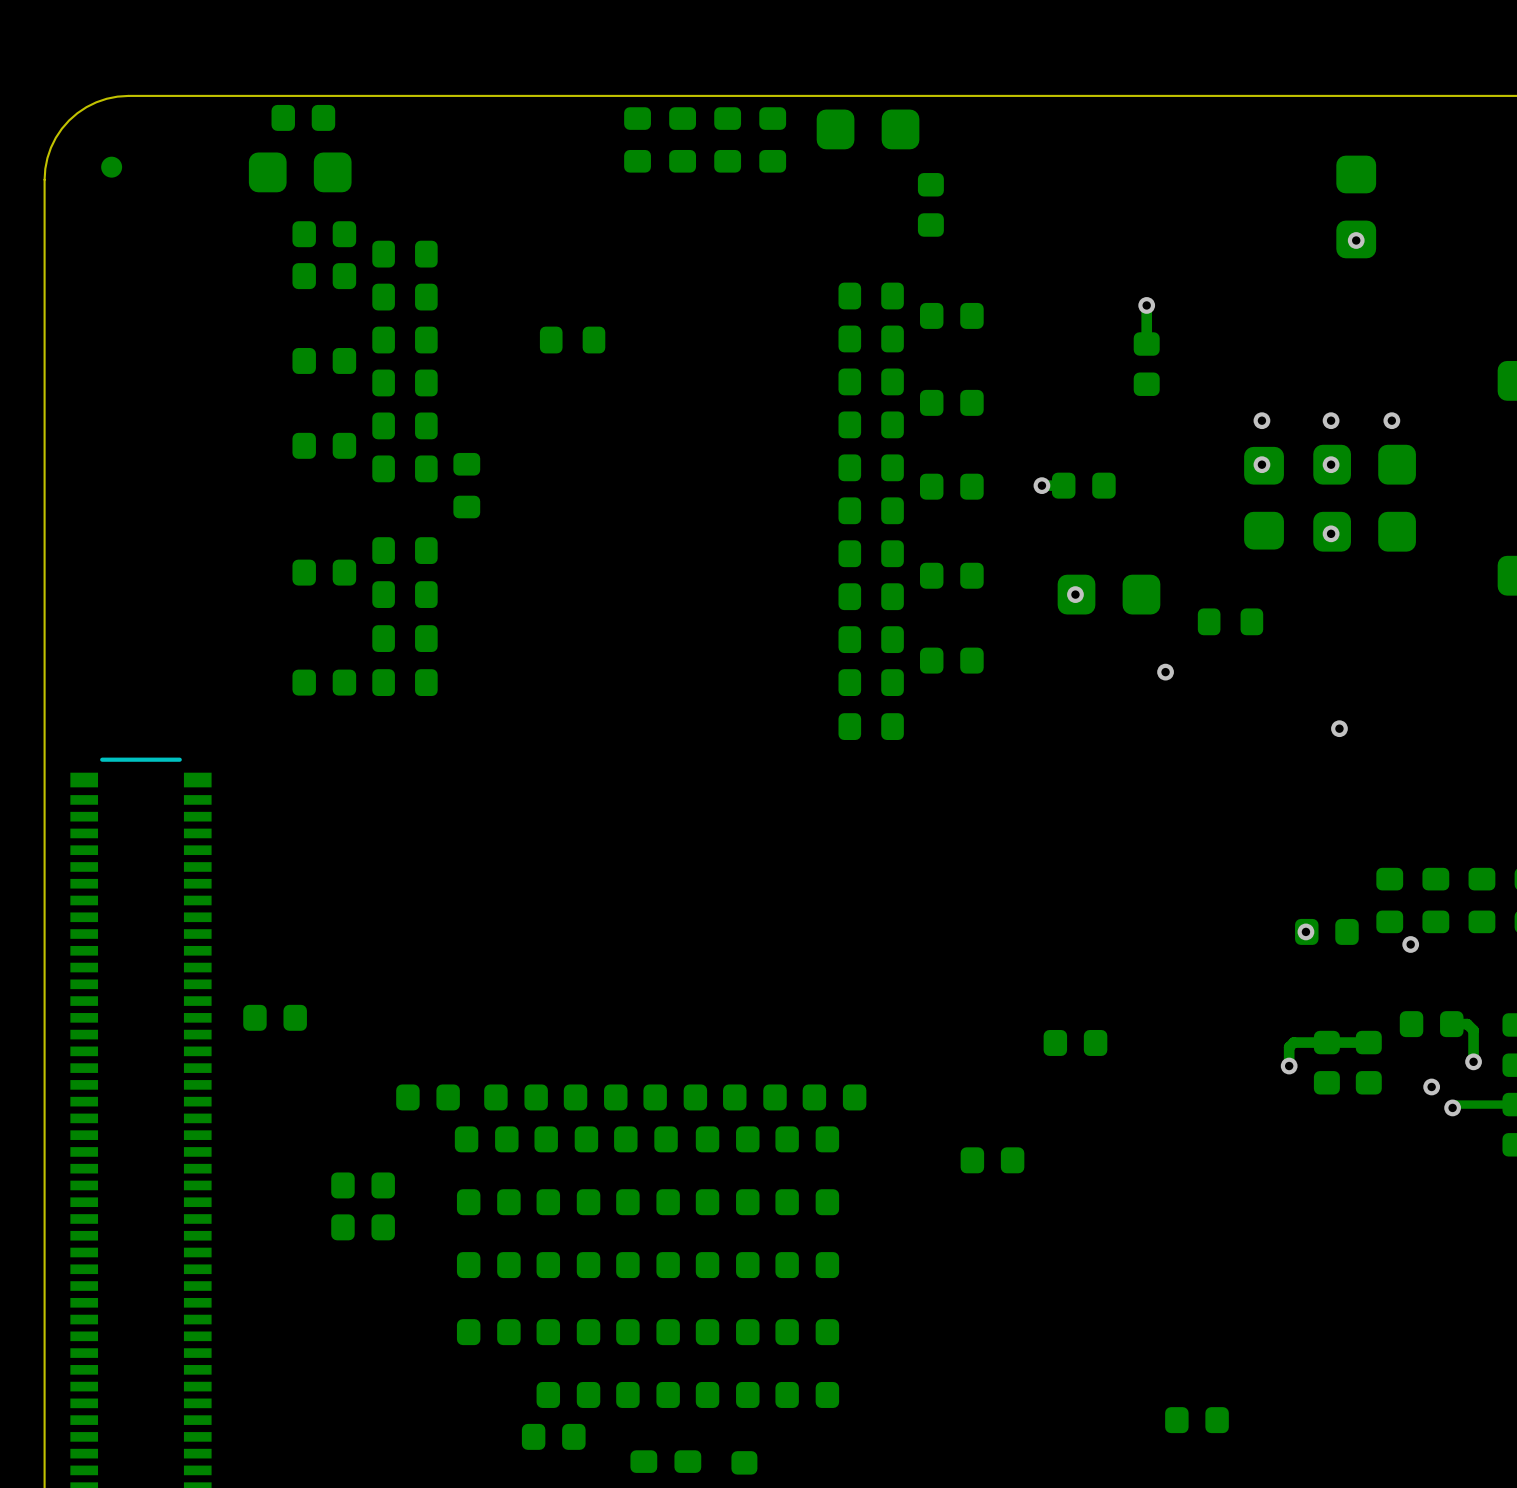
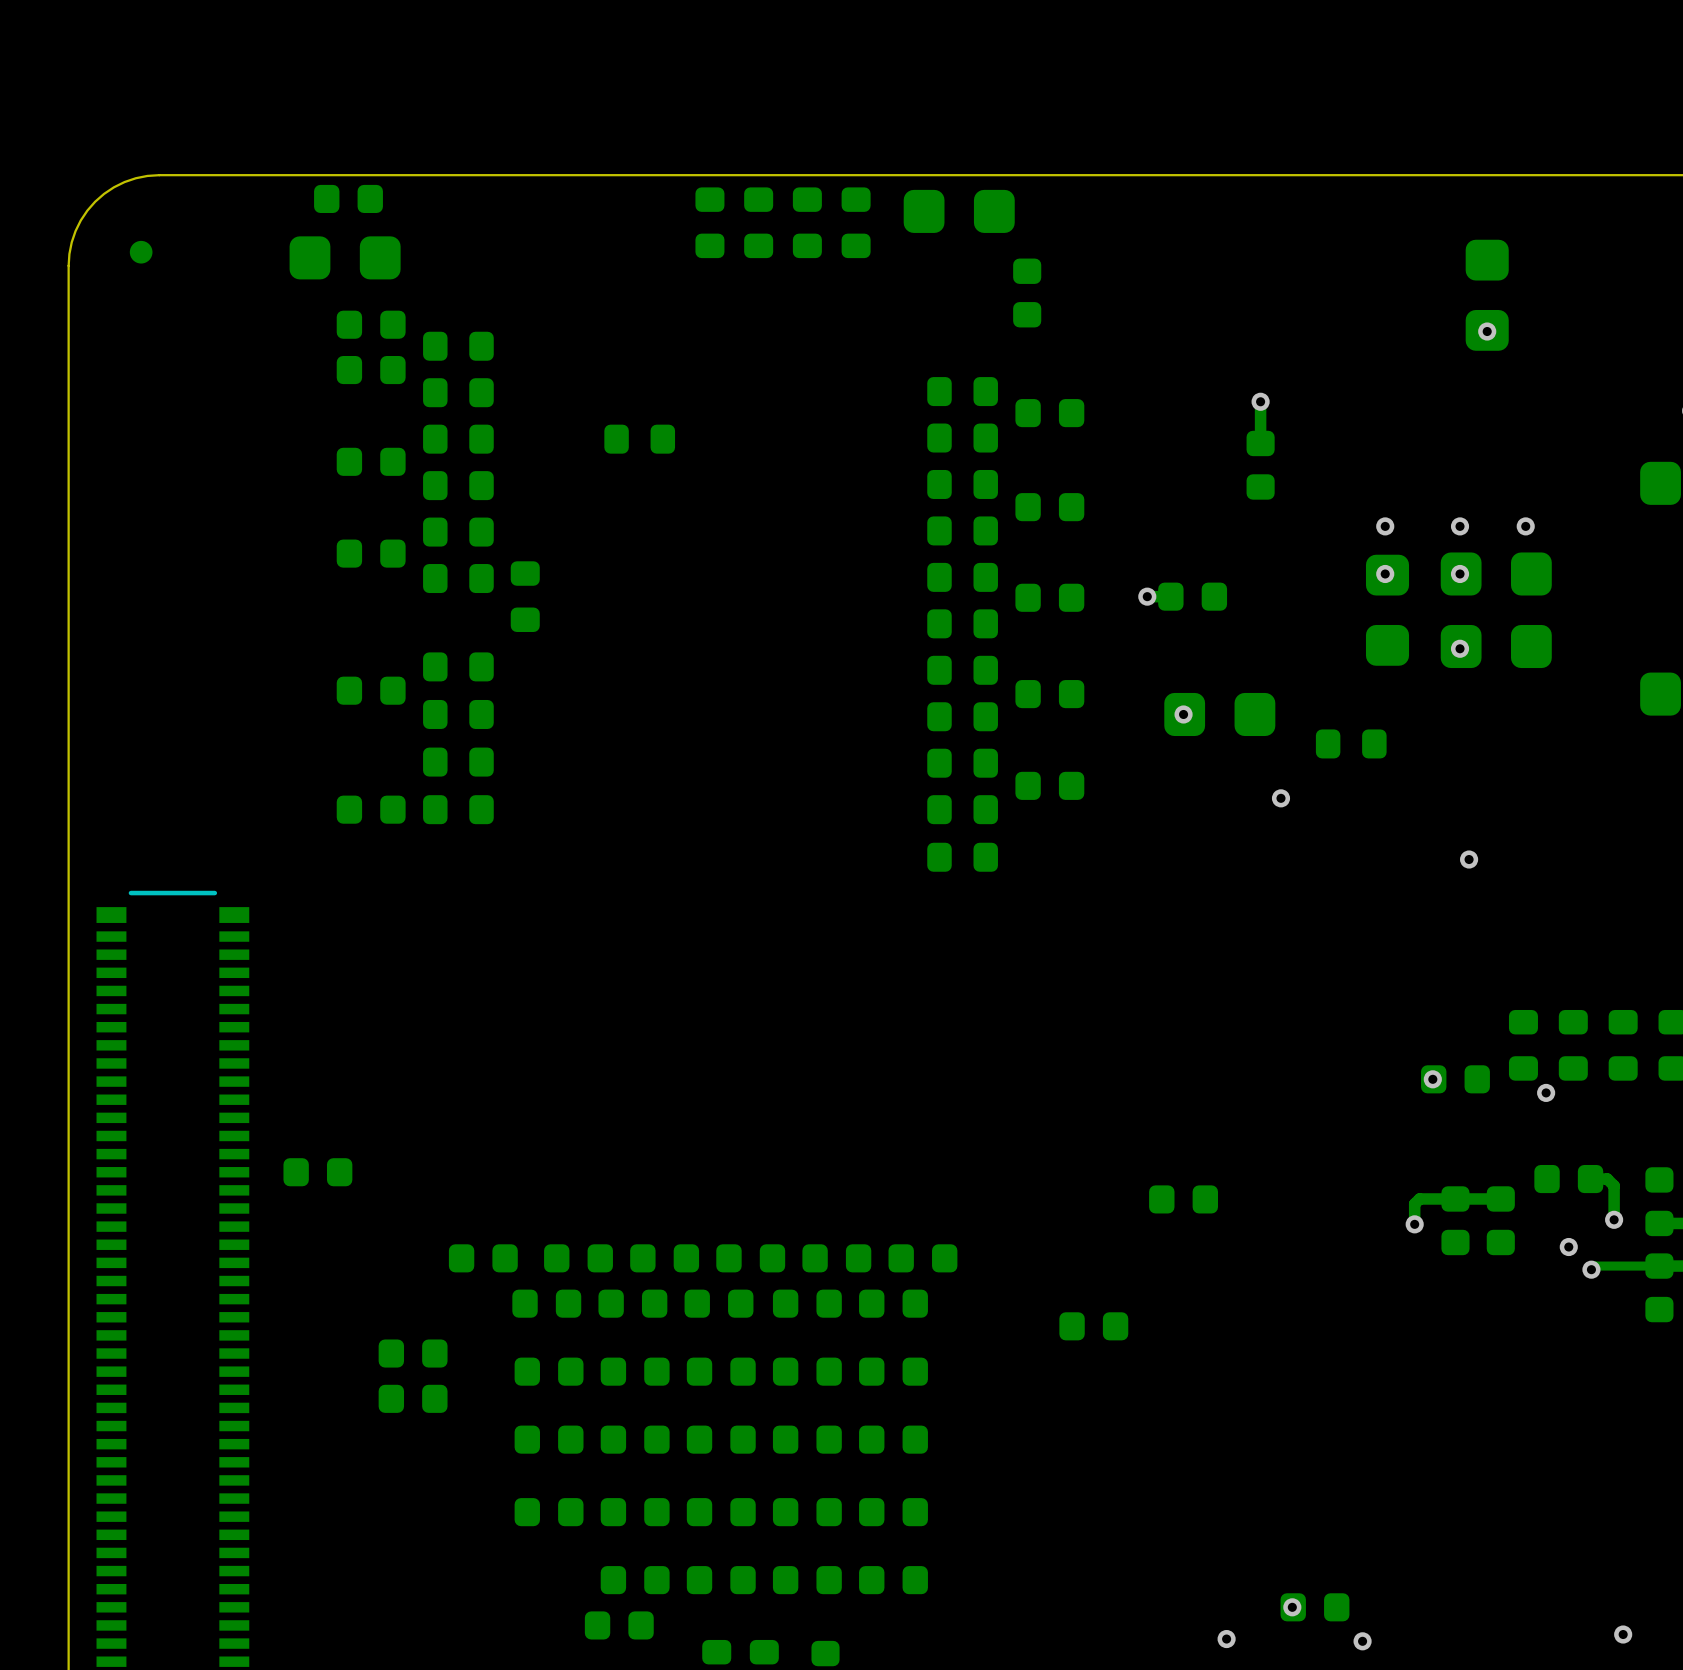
via: none -> (1292, 1607)
via: none -> (1623, 1634)
via: none -> (1226, 1639)
via: none -> (1362, 1641)

